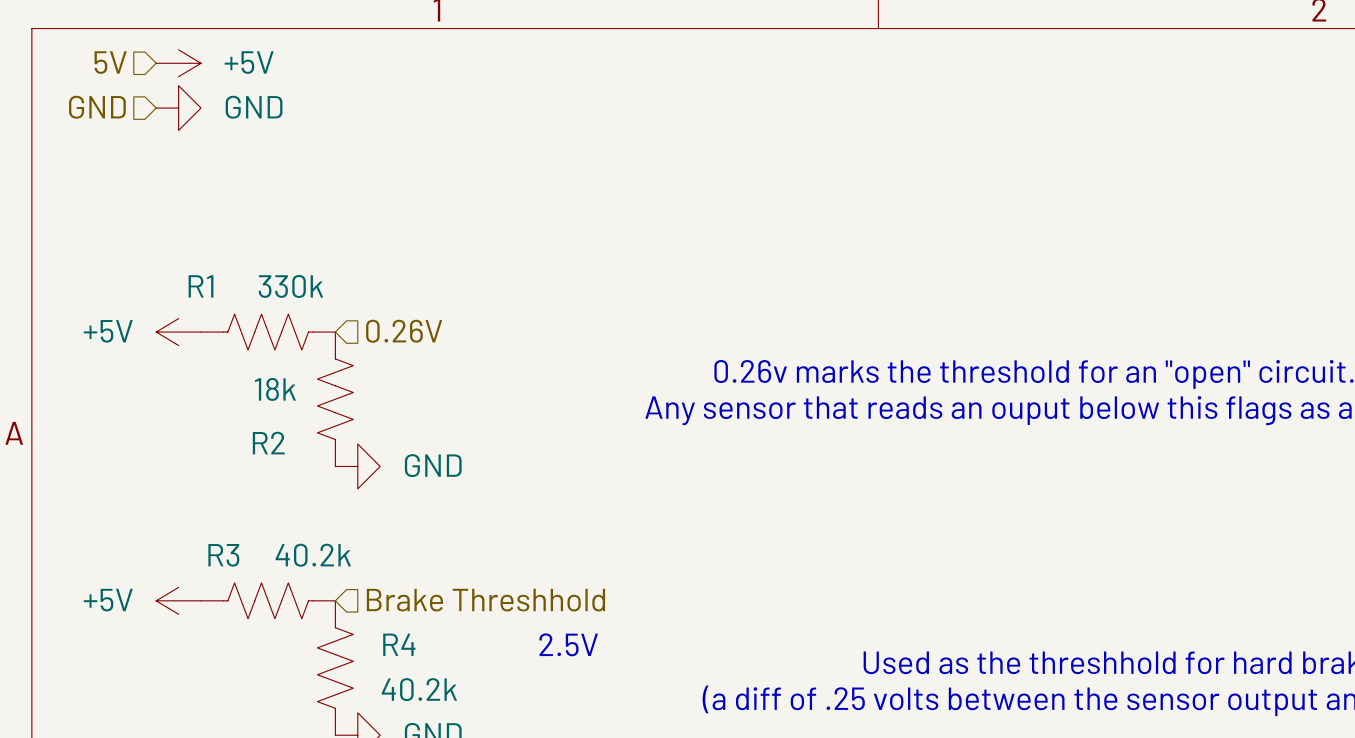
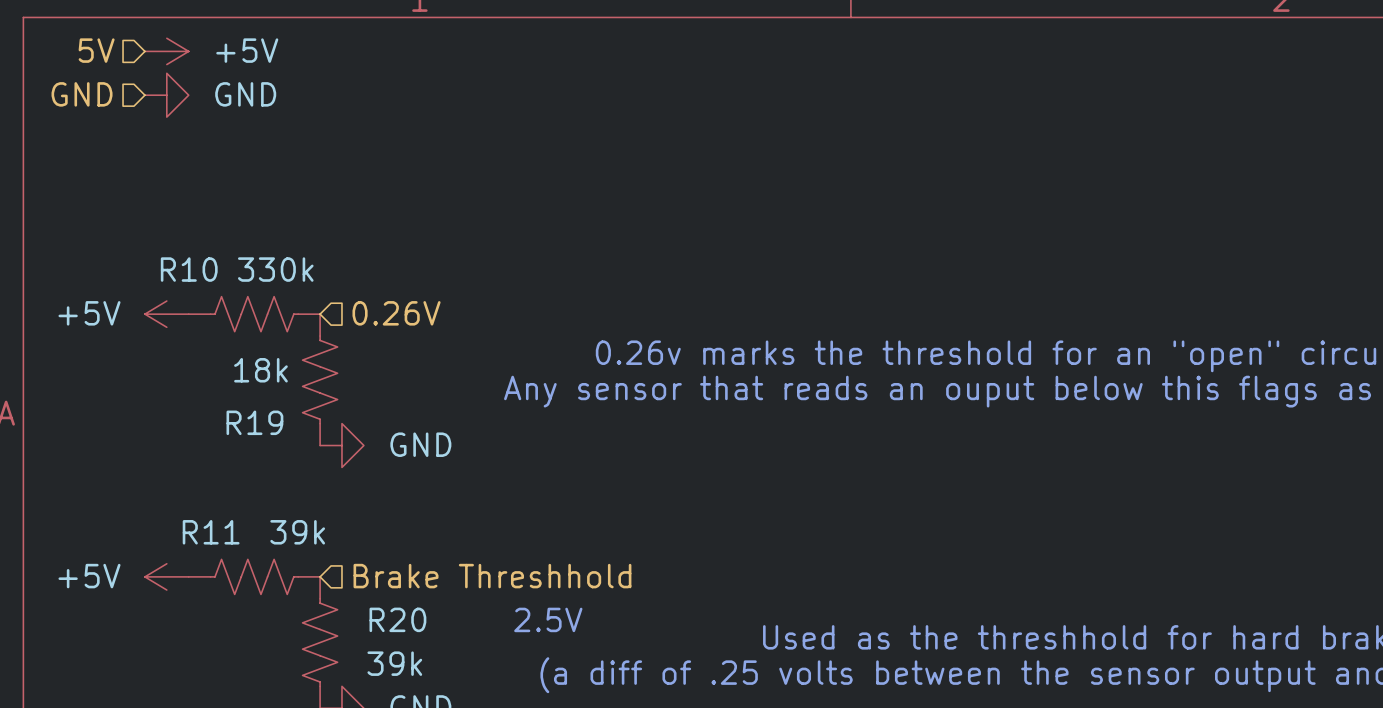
R1 name: R1 (201, 286) -> R10 (189, 269)
R2 name: R2 (268, 443) -> R19 (254, 422)
R3 name: R3 (223, 555) -> R11 (211, 532)
R3 value: 40.2k (313, 555) -> 39k (297, 532)
R4 name: R4 (399, 644) -> R20 (397, 619)
R4 value: 40.2k (419, 689) -> 39k (394, 663)

